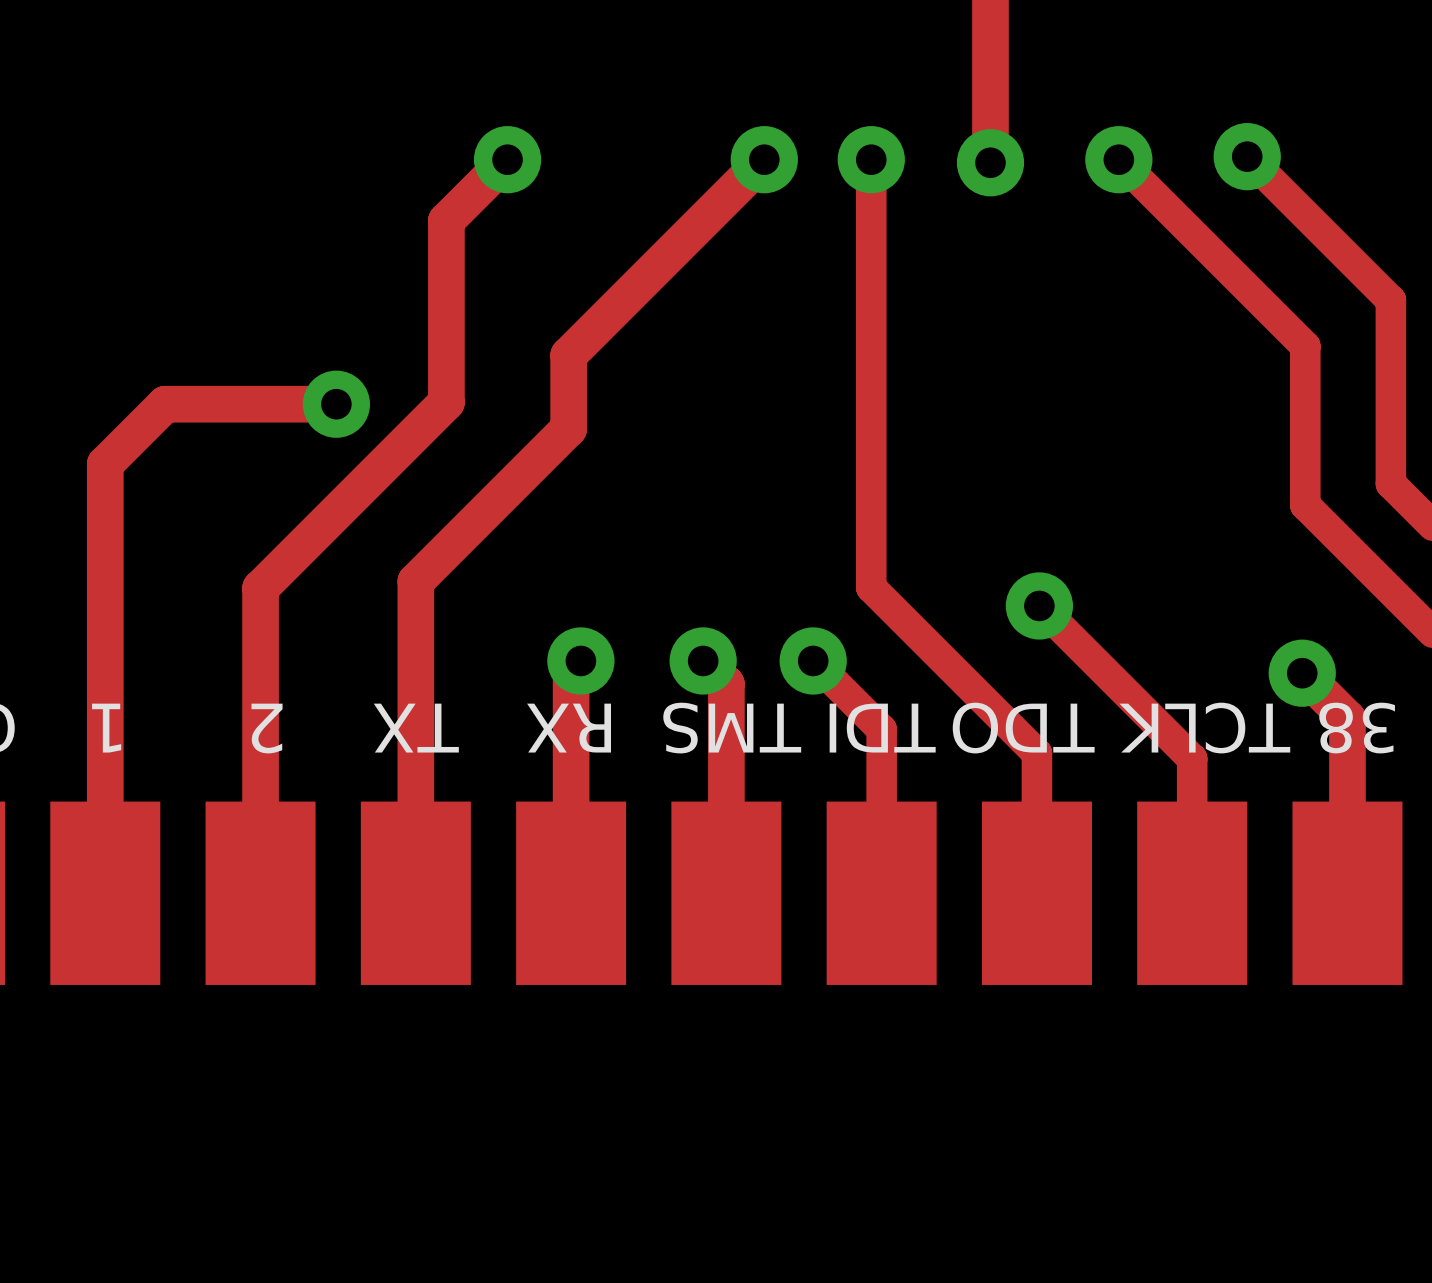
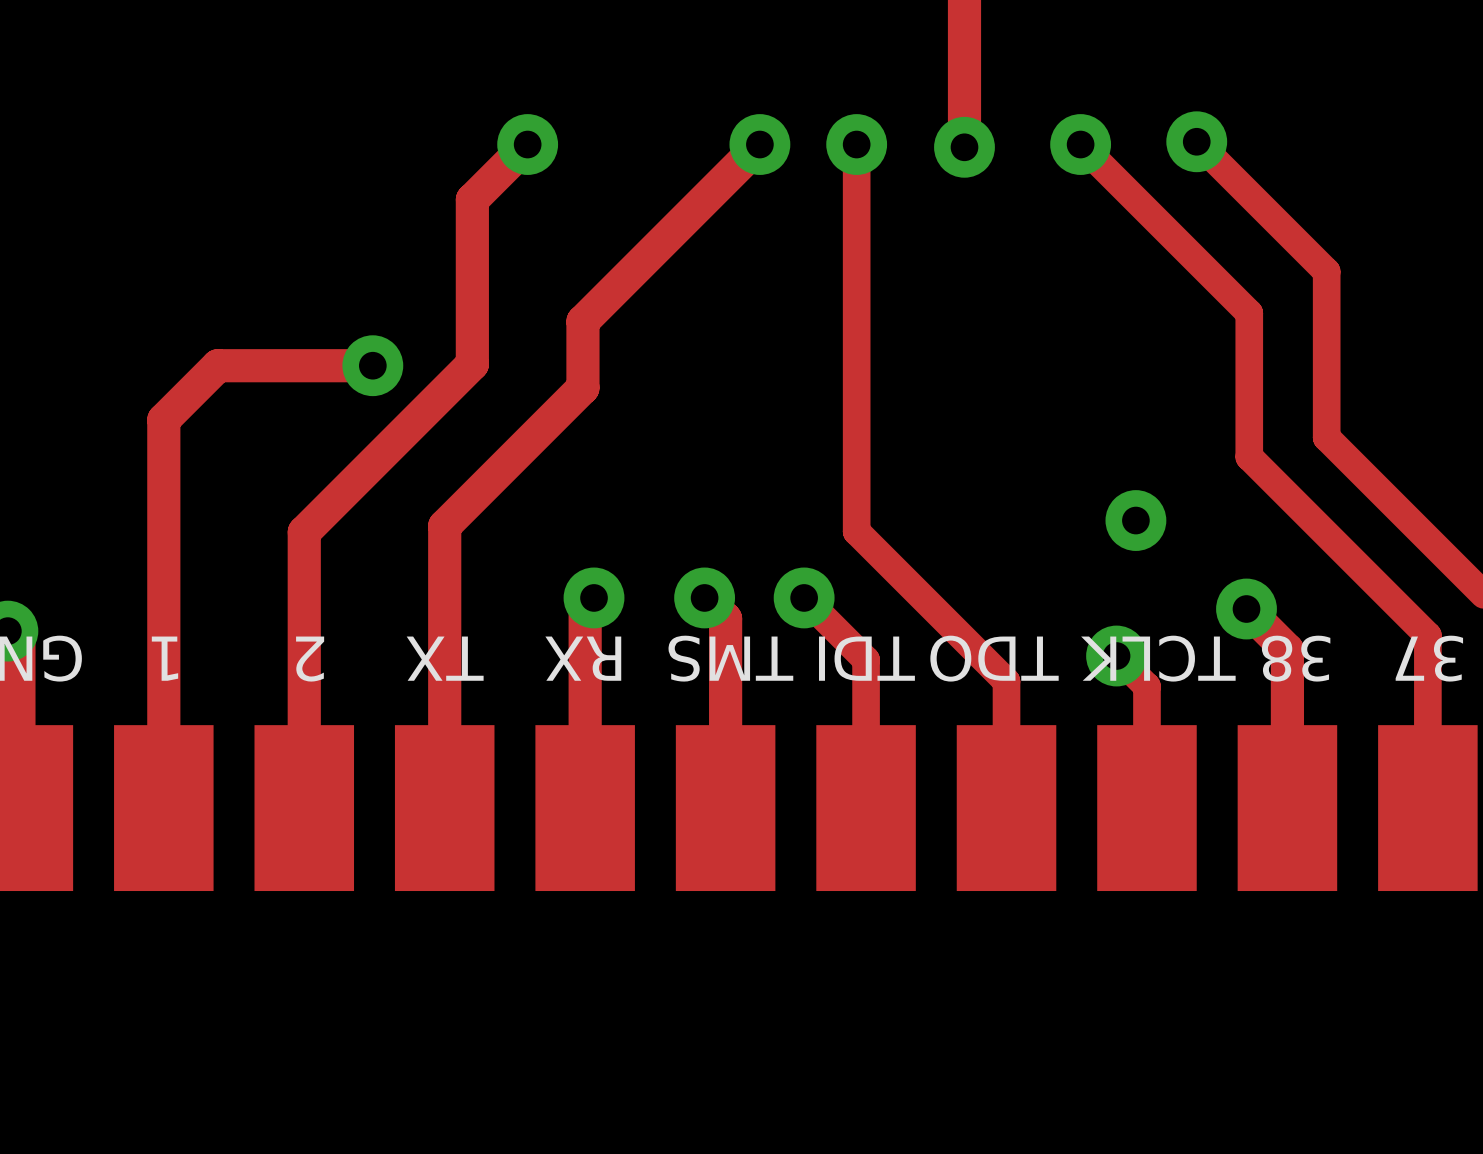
via: none -> (1135, 520)
track: (1039, 605) (1158, 725) -> none
via: (1039, 605) -> none
via: none -> (1116, 656)

